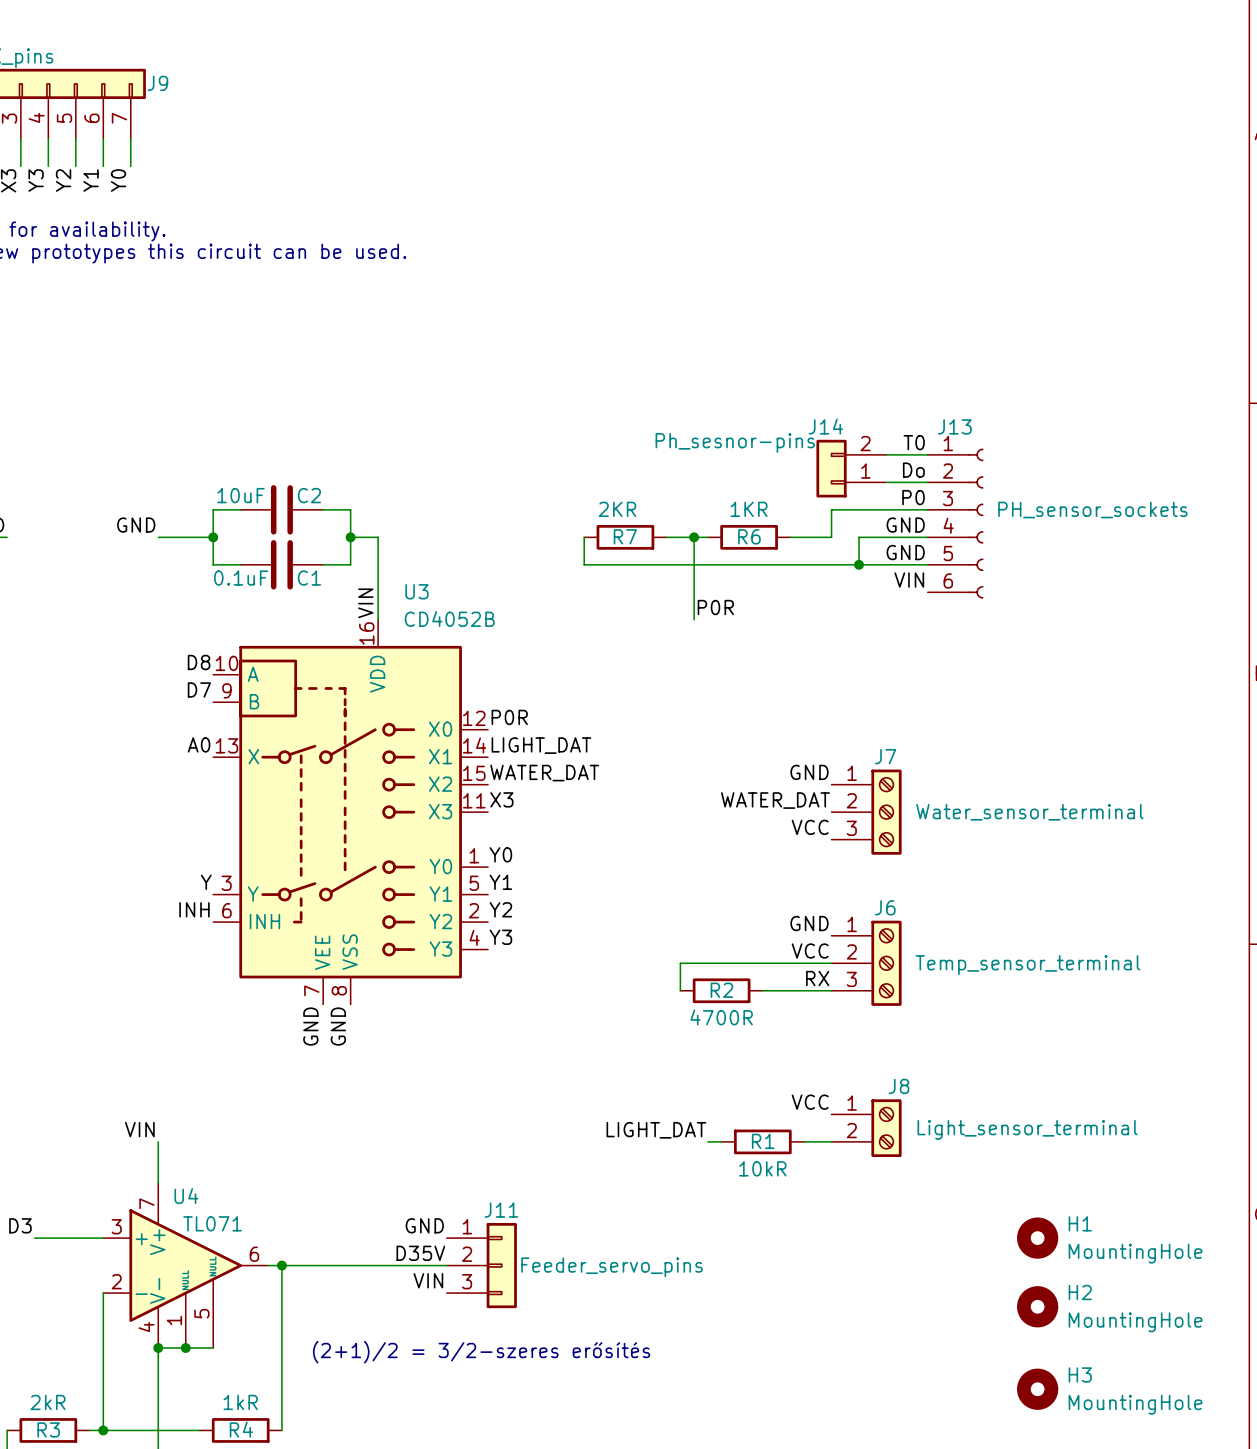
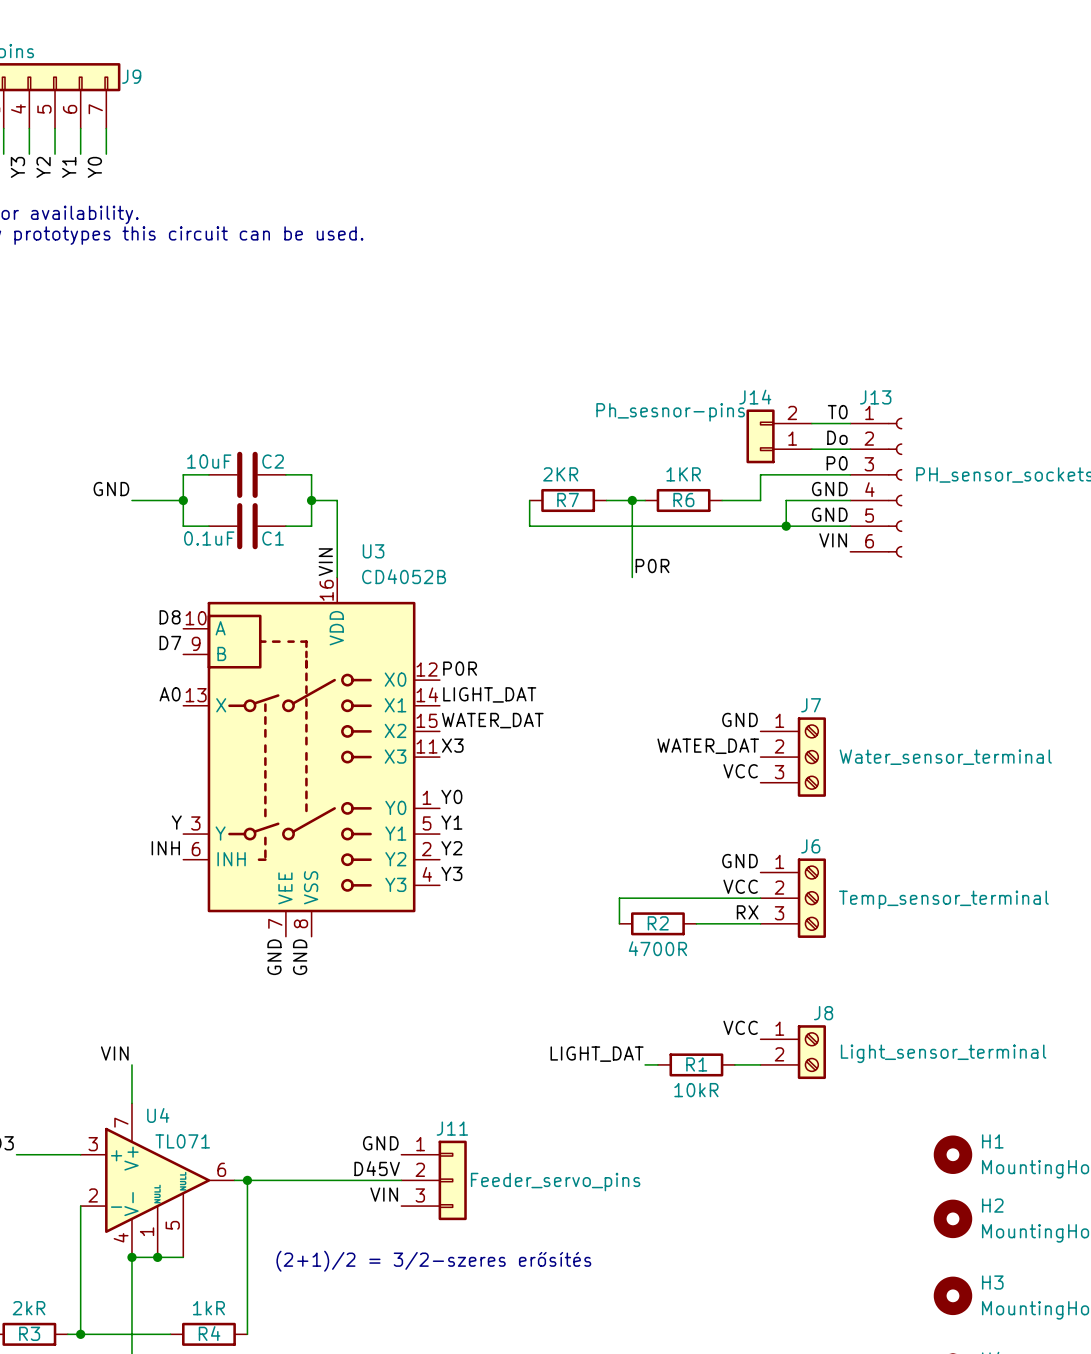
label: D35V (420, 1253) -> D45V (377, 1168)

